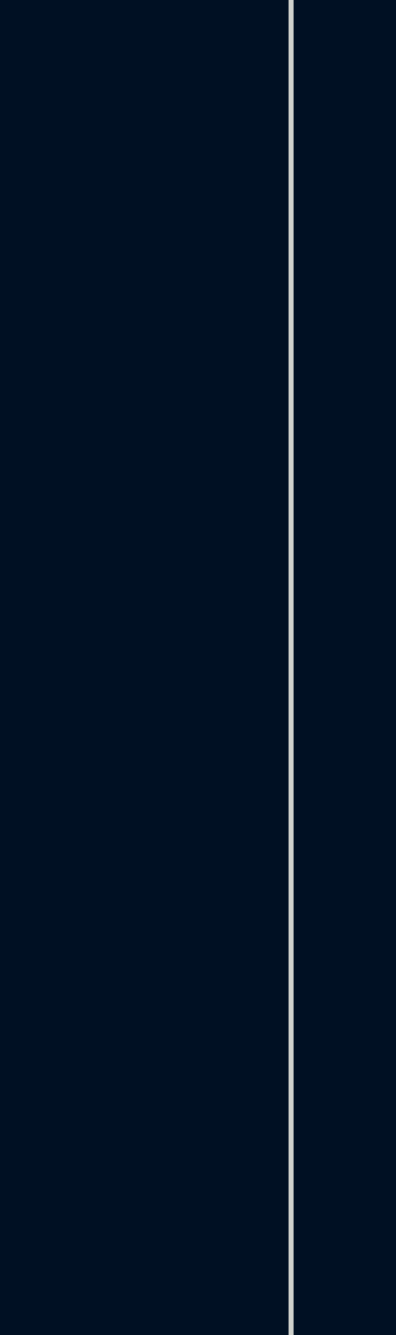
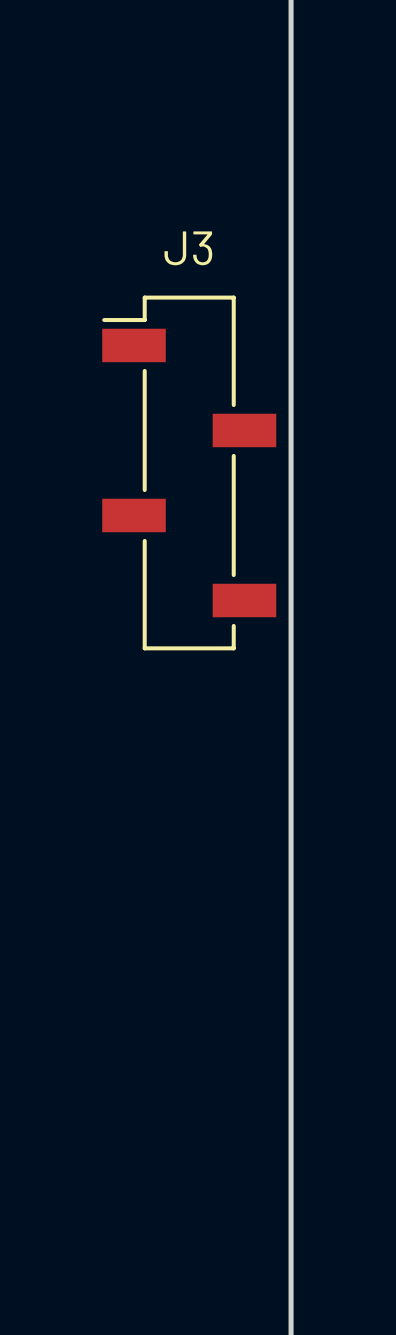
J3: none -> (189, 472)

